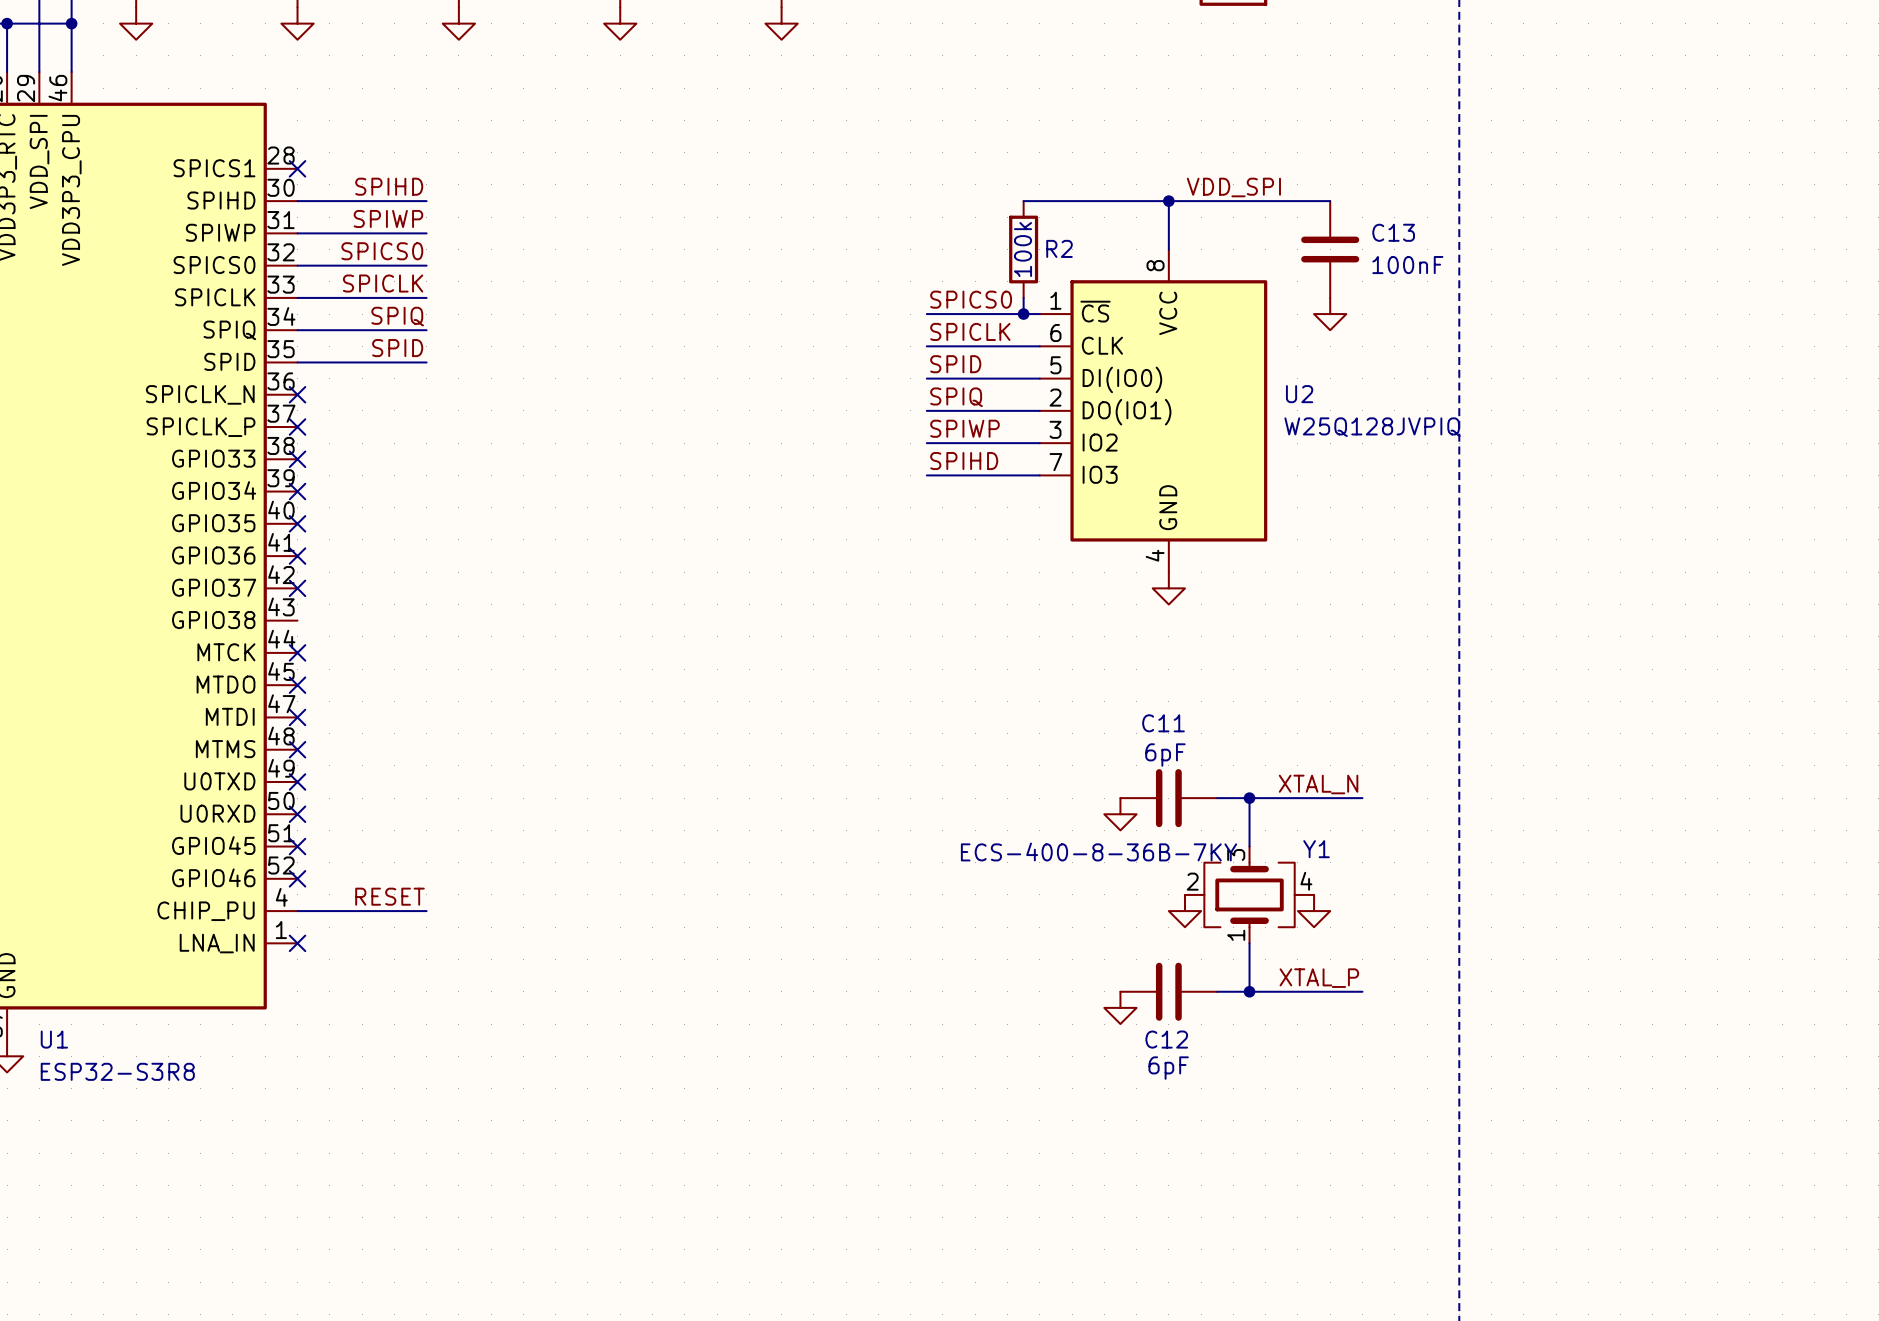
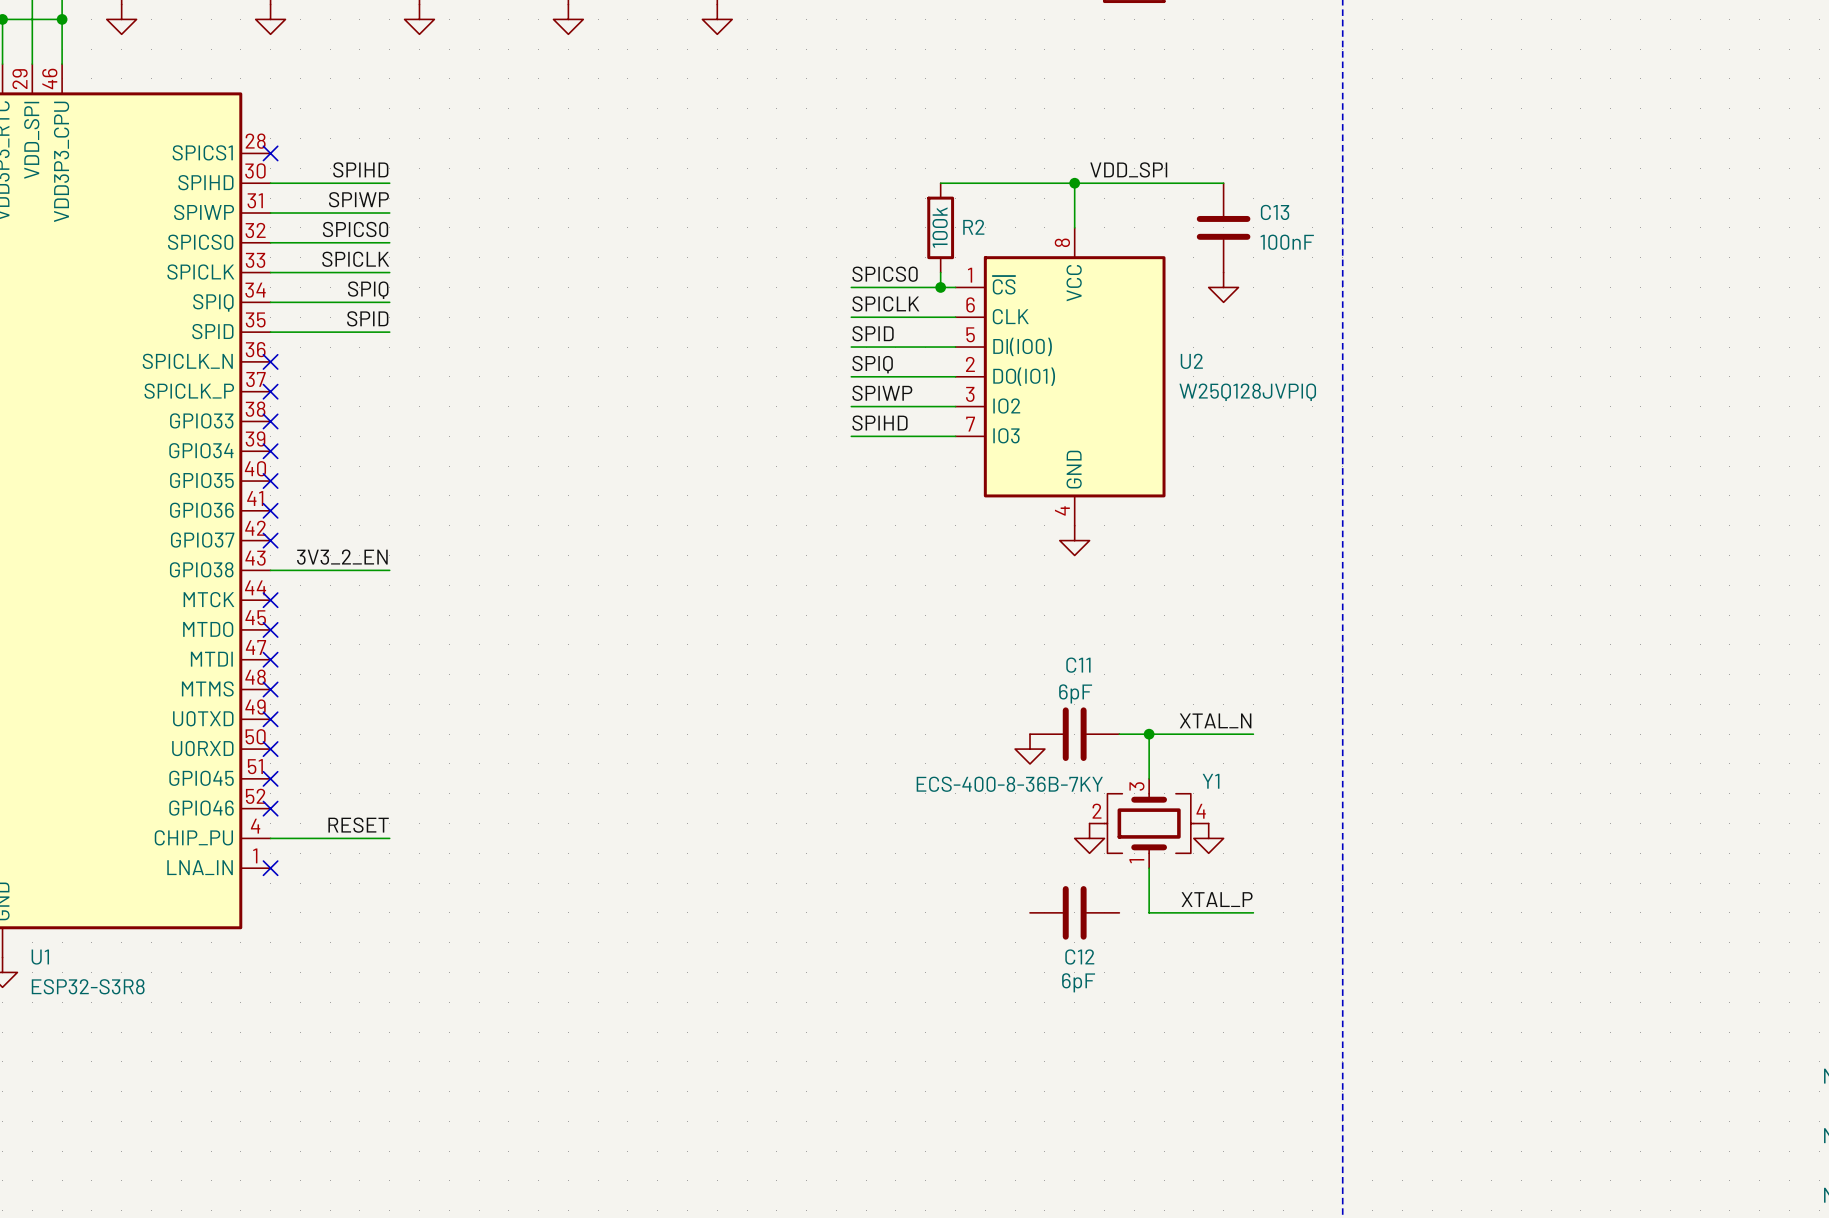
label: none -> 3V3_2_EN (342, 557)
wire: none -> (270, 570) (389, 570)
wire: (1217, 991) (1249, 991) -> none
junction: (1249, 991) -> none
power symbol: (1120, 1007) -> none

